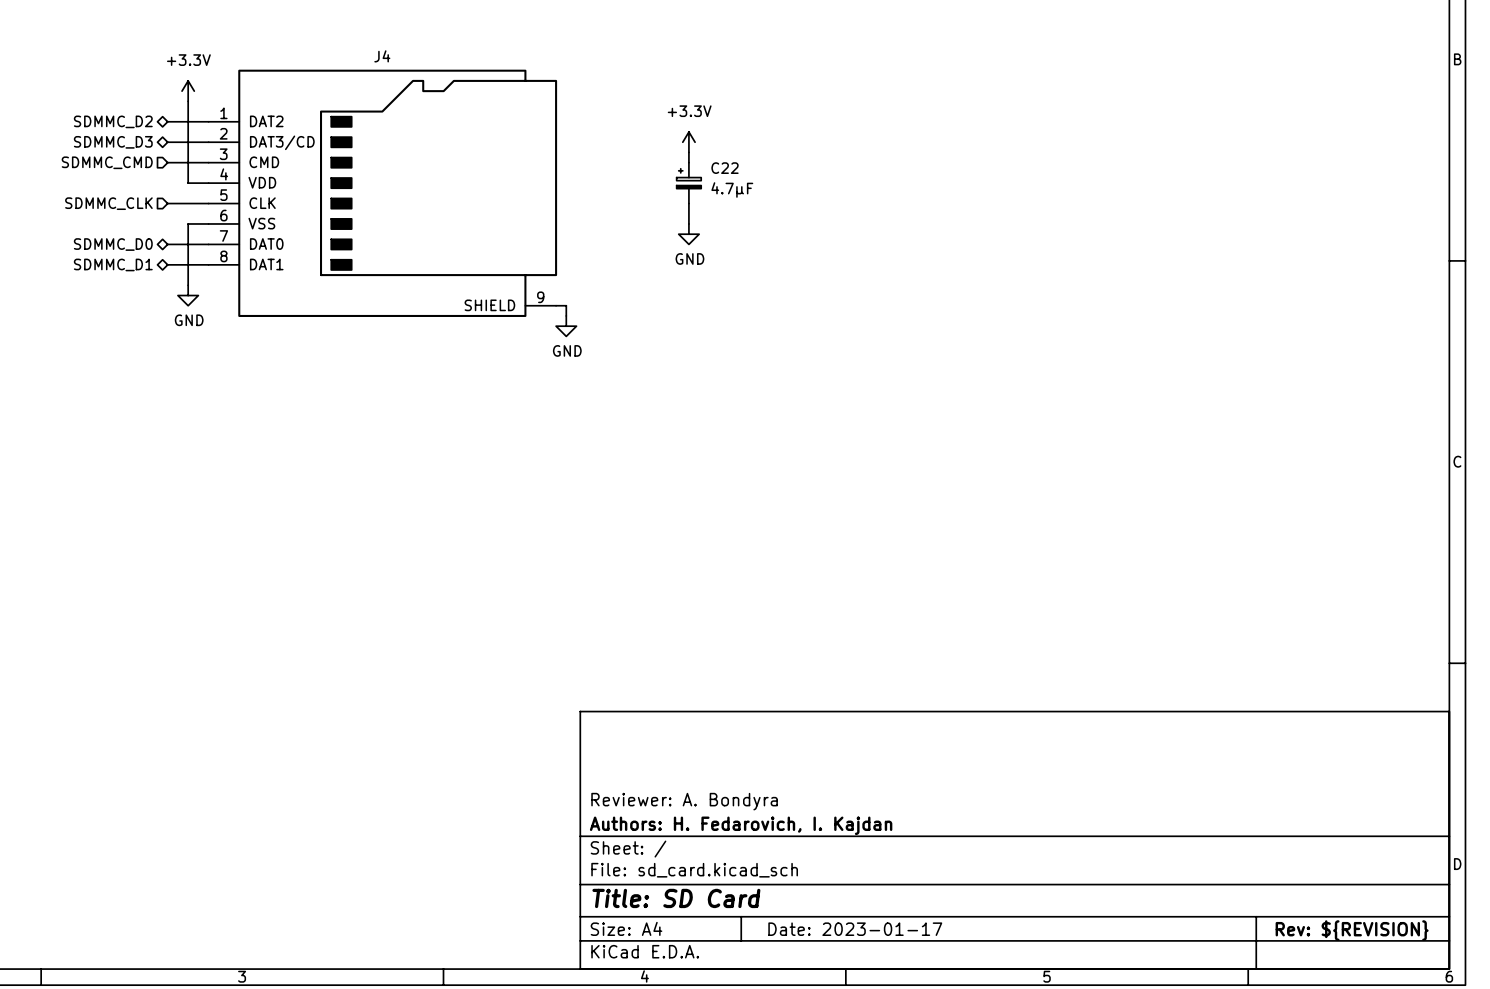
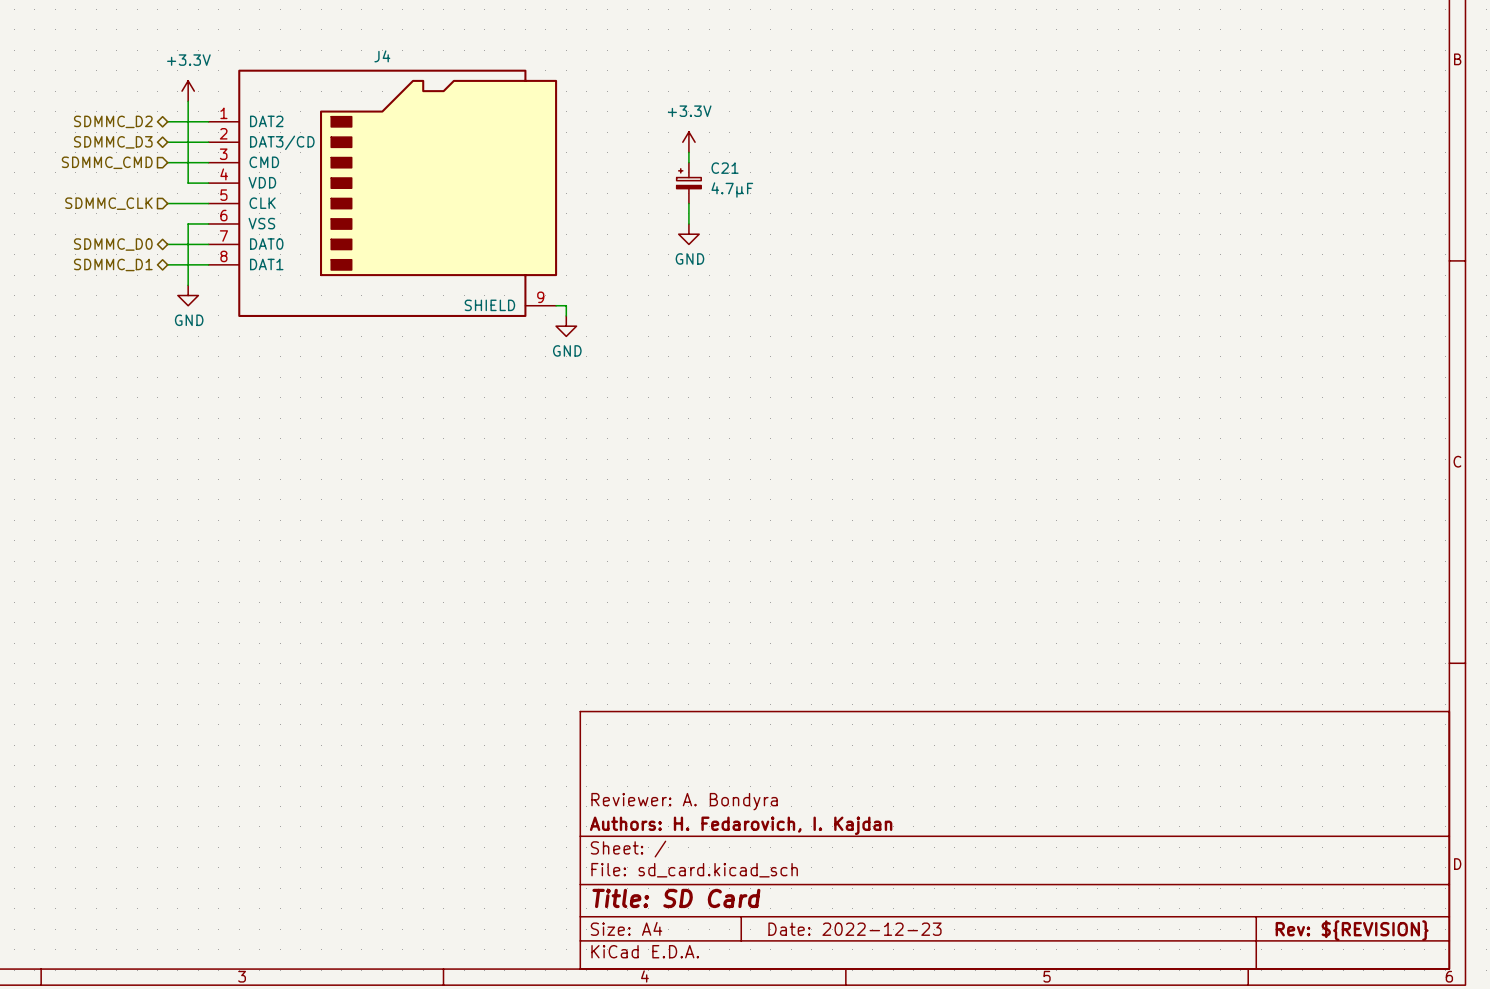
C22 name: C22 (725, 168) -> C21 (725, 168)
title block: Date: 2023-01-17 (855, 929) -> Date: 2022-12-23 (854, 929)

